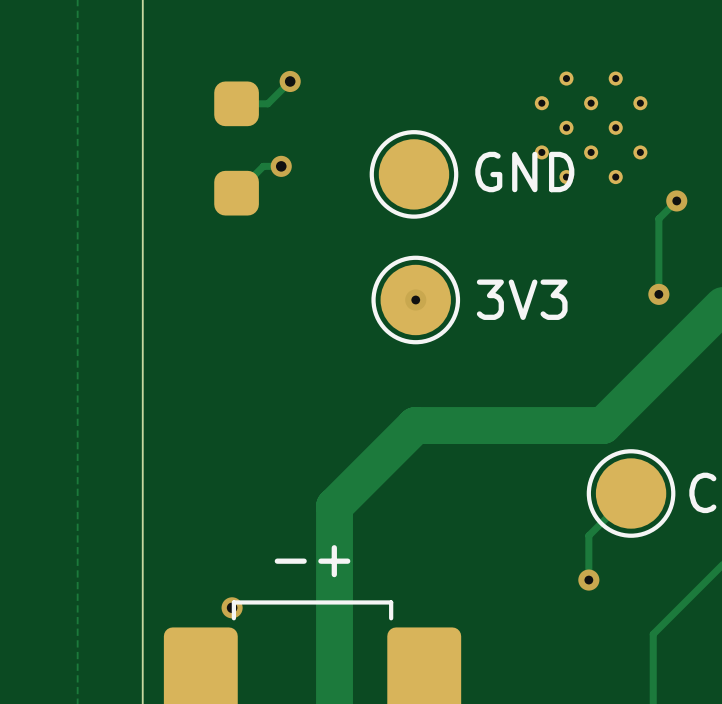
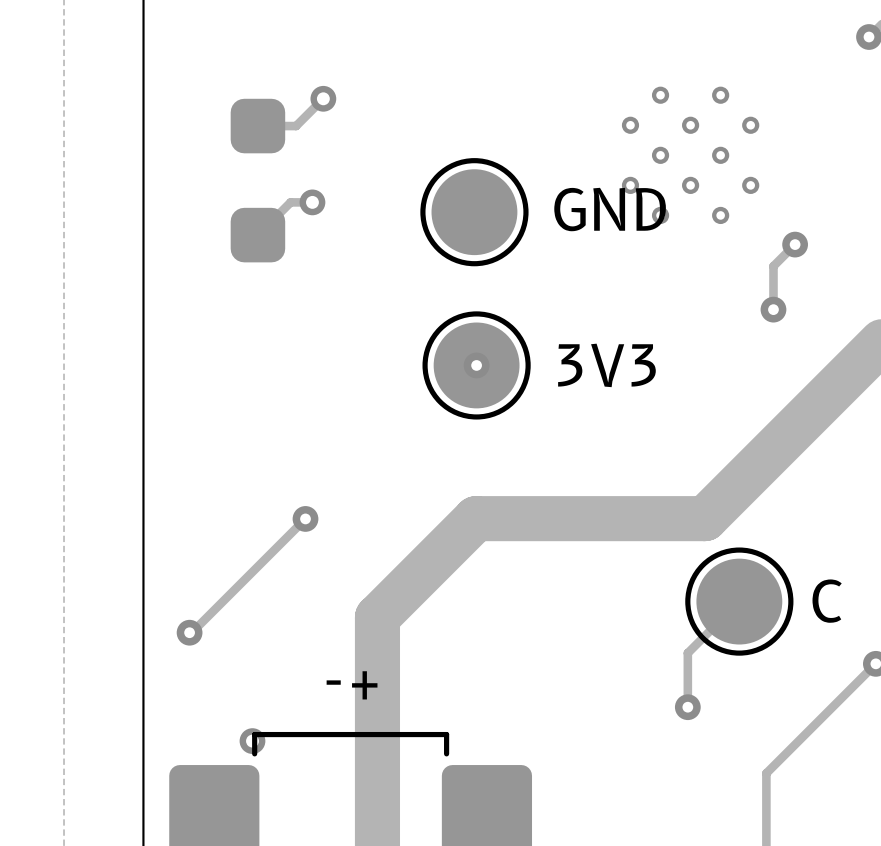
track: (658, 218) (658, 294) -> (773, 266) (773, 309)
via position: (658, 294) -> (773, 309)
track: none -> (305, 518) (191, 632) (189, 632)
via: none -> (305, 518)
via: none -> (189, 632)

